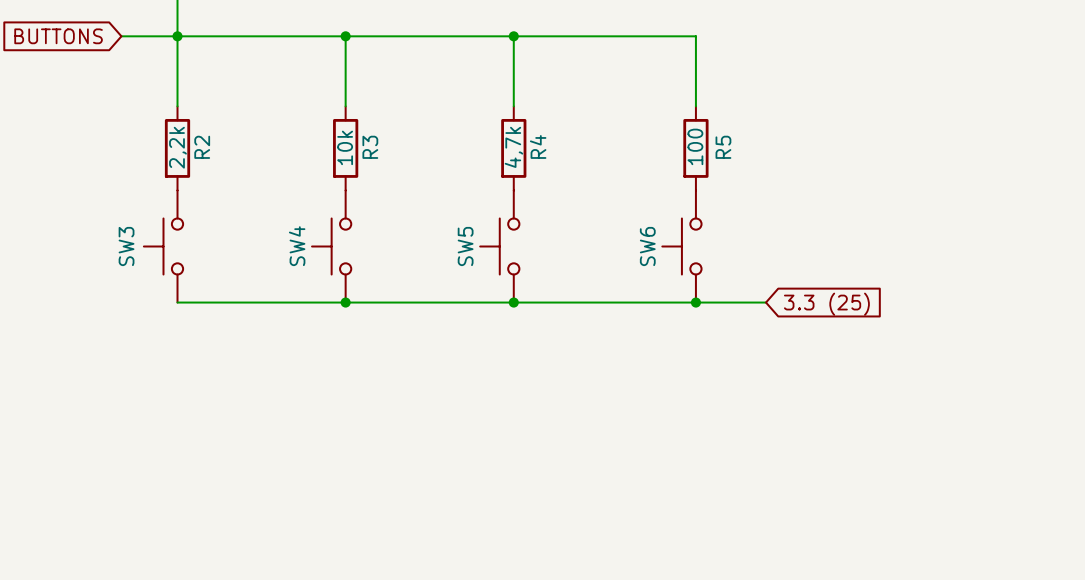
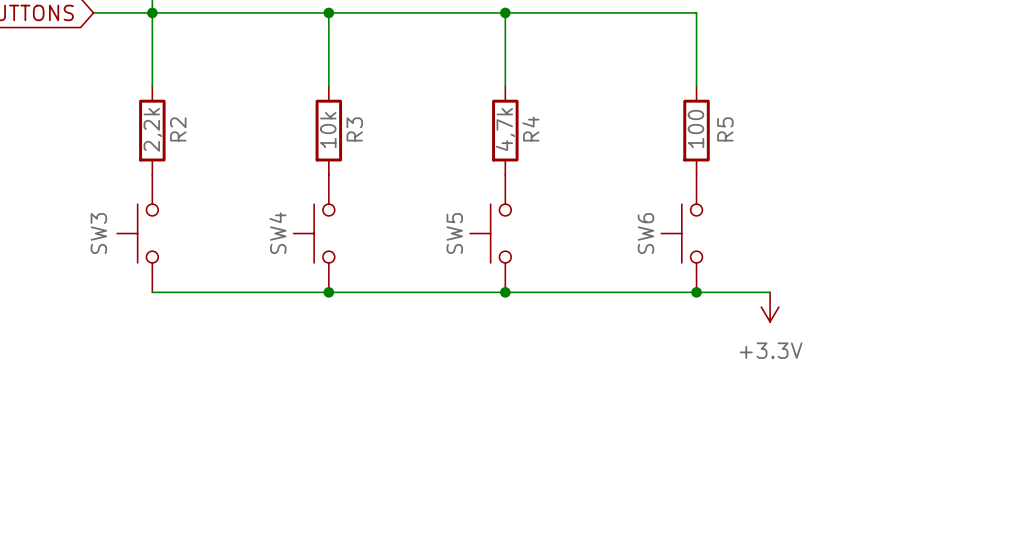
global label: 3.3 (25) (826, 304) -> none
power symbol: none -> +3.3V (770, 307)

